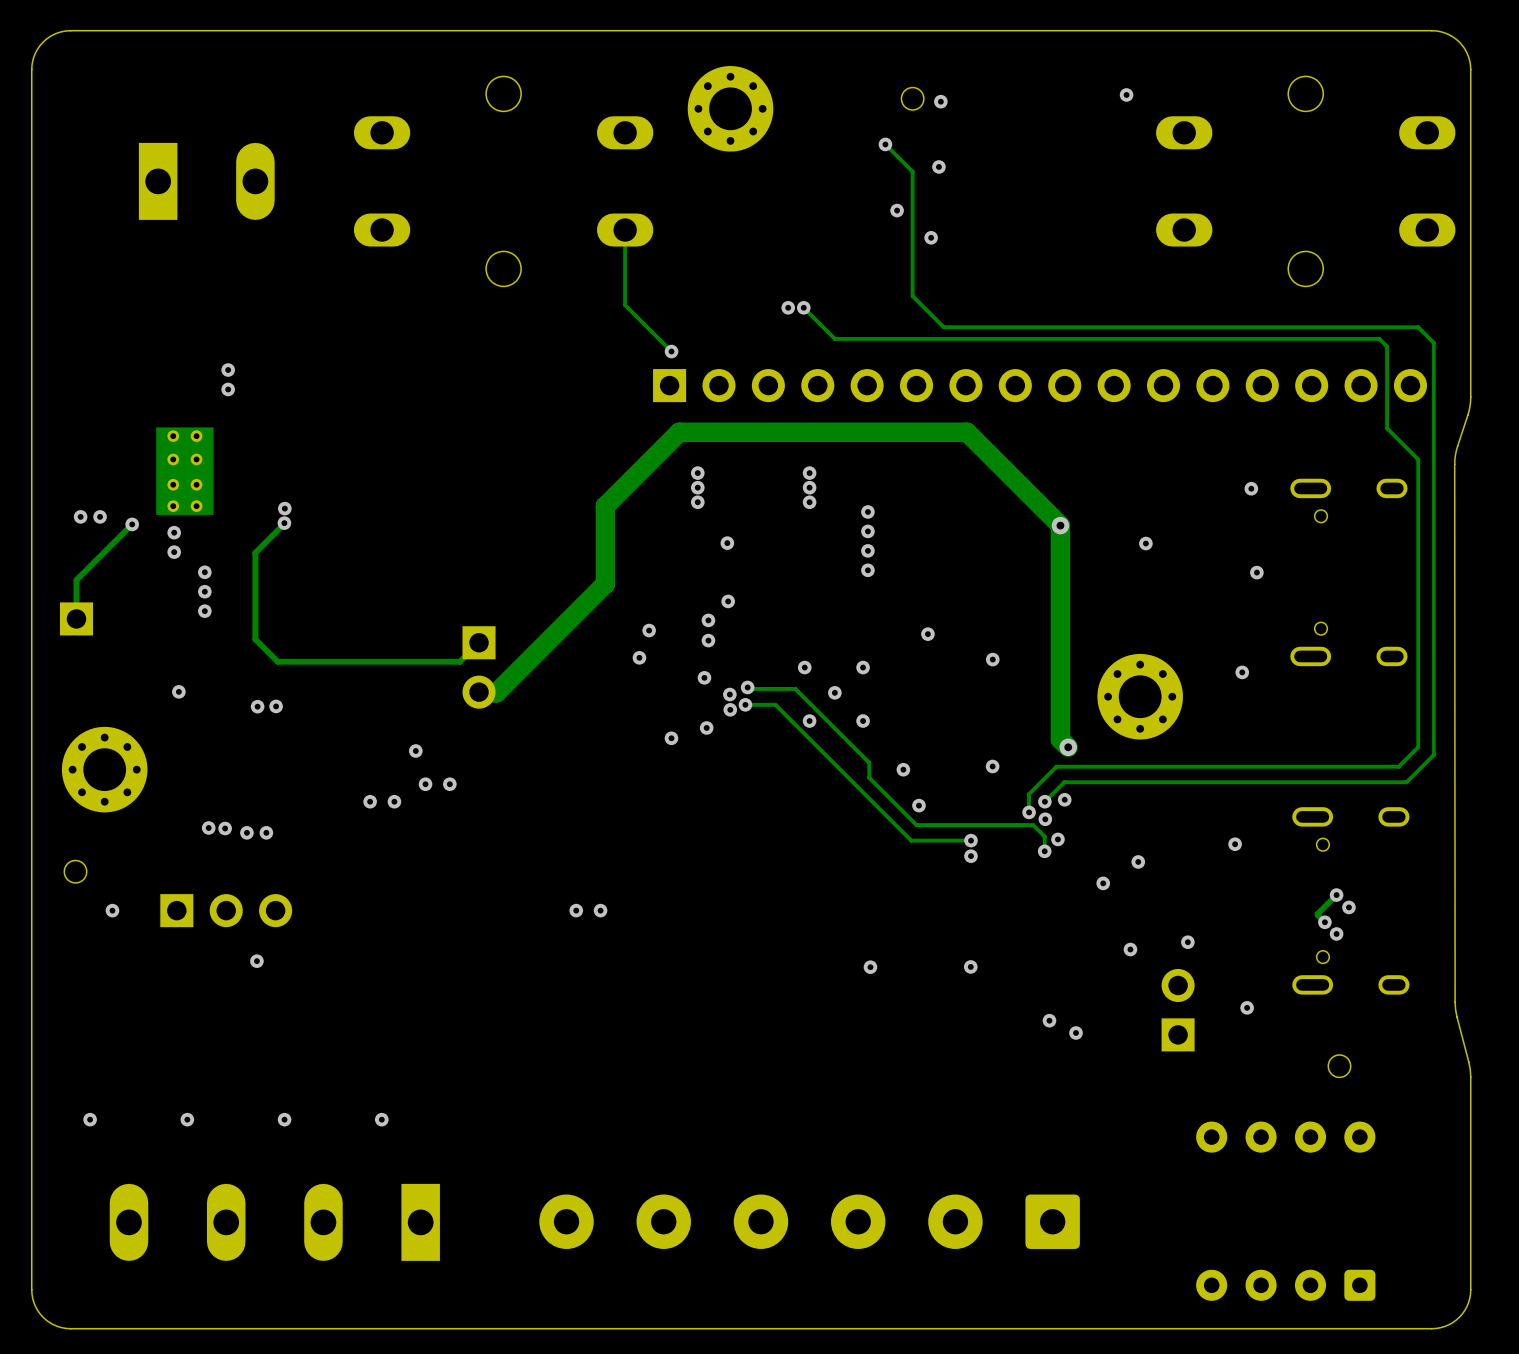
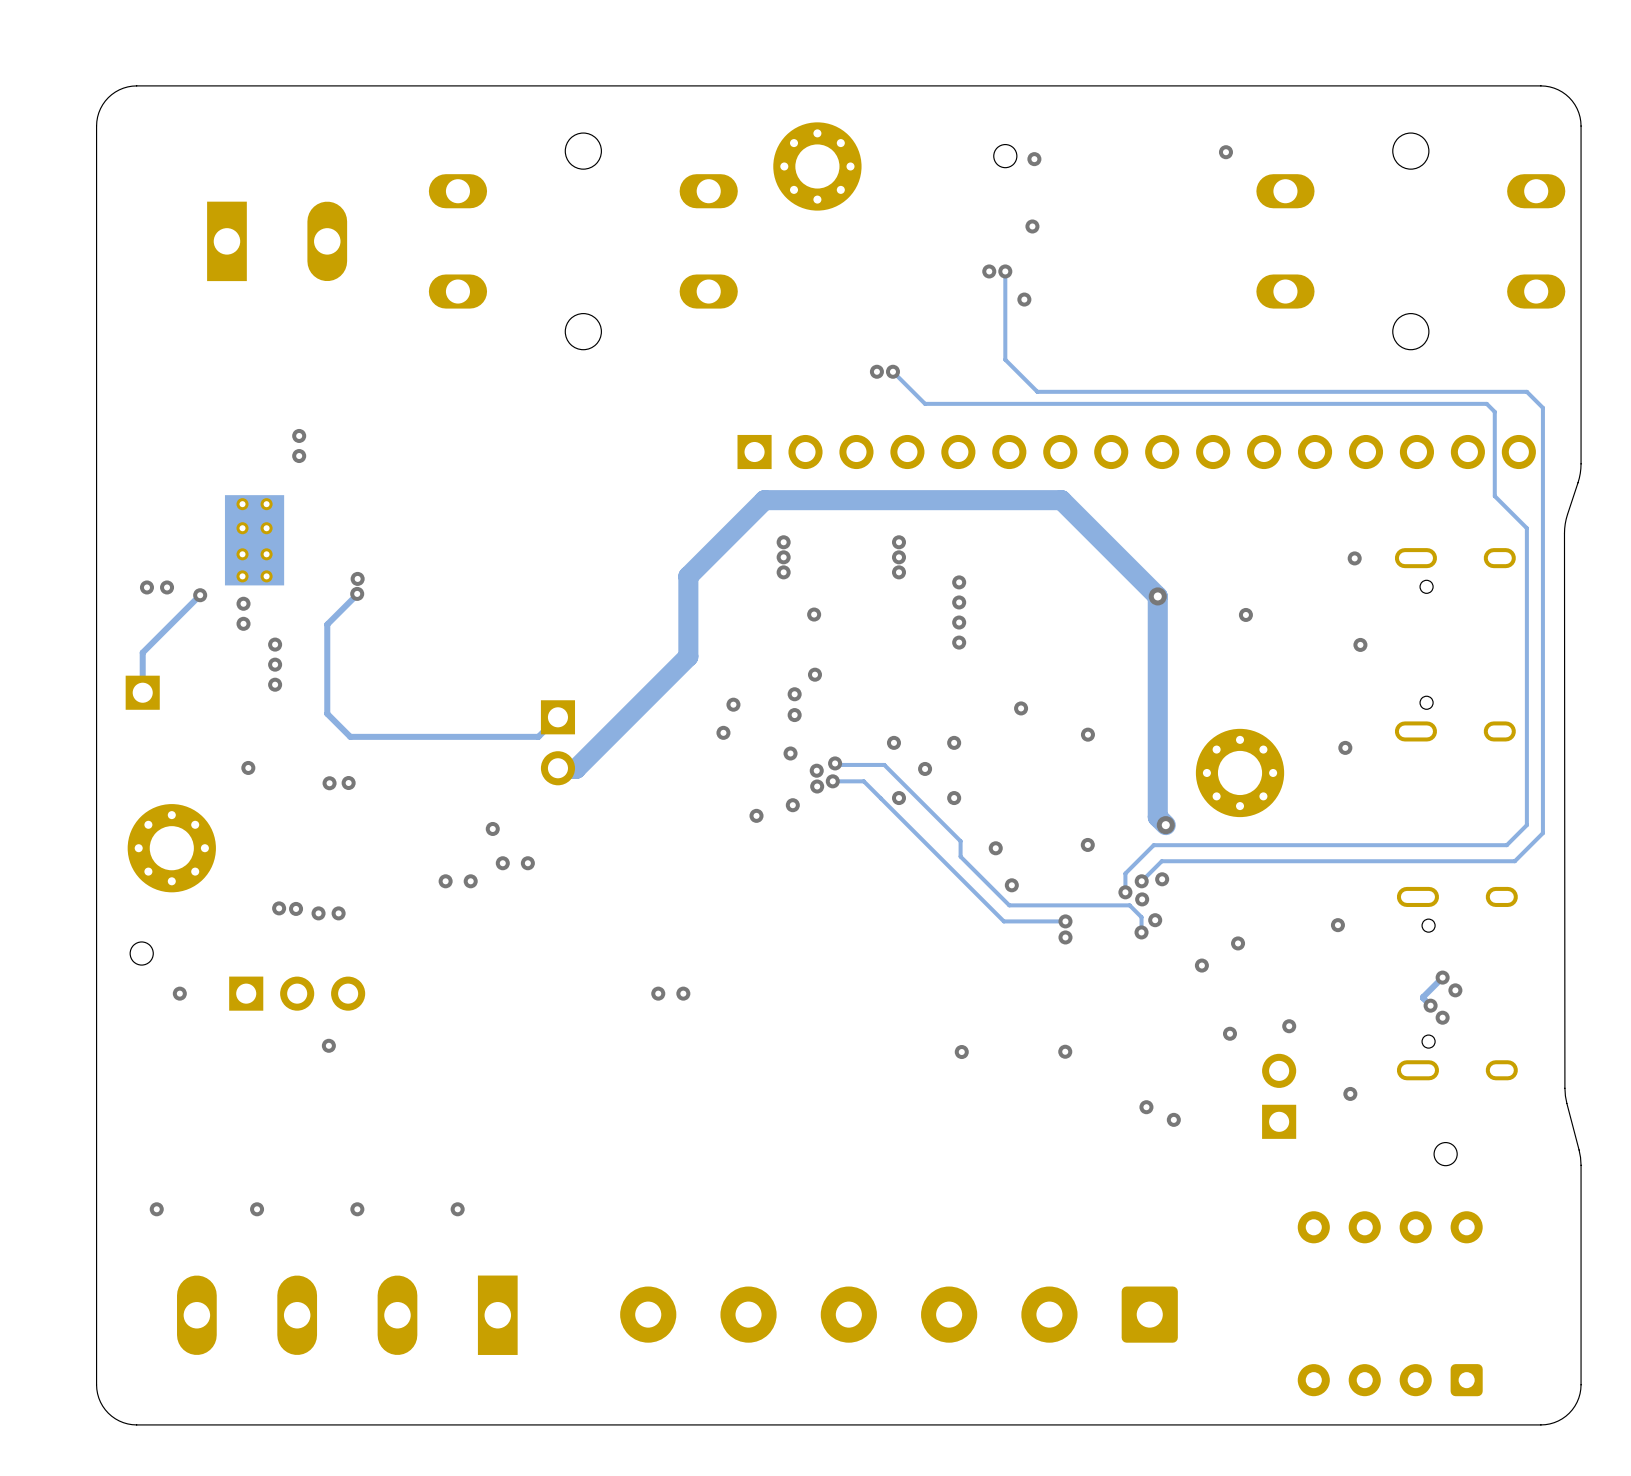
track: (885, 144) (912, 171) (912, 210) -> none
via position: (885, 144) -> (1005, 271)
track: (625, 230) (625, 305) (671, 351) -> none
via: (671, 351) -> none

